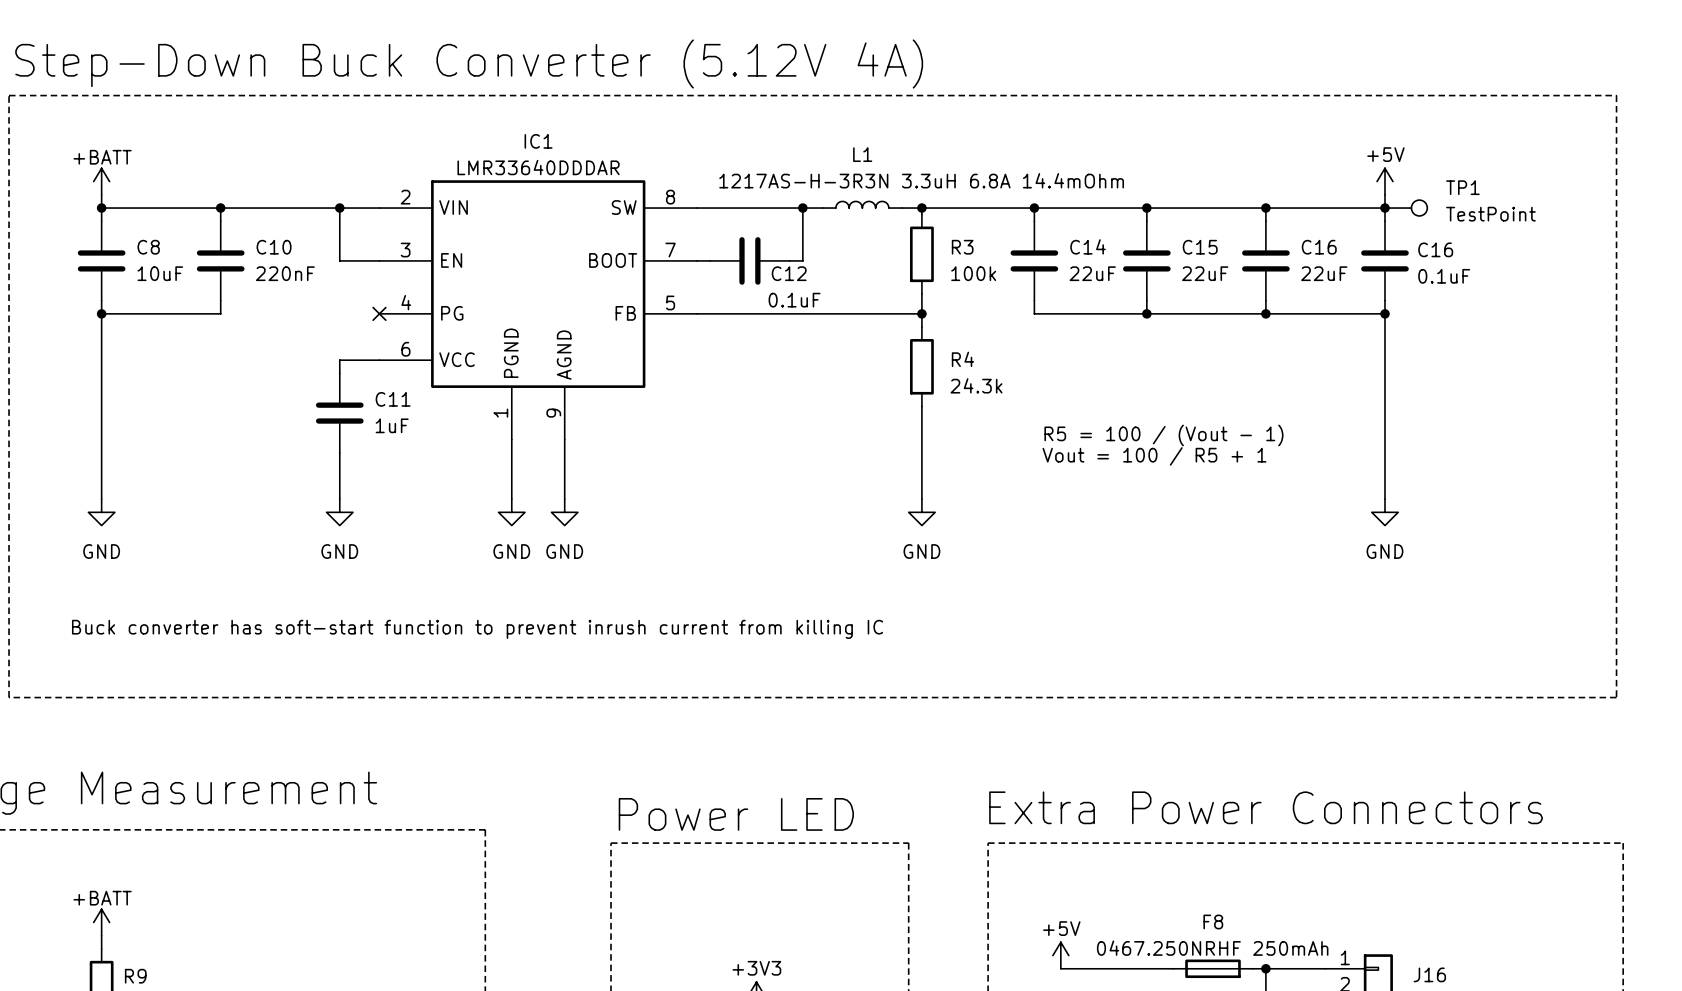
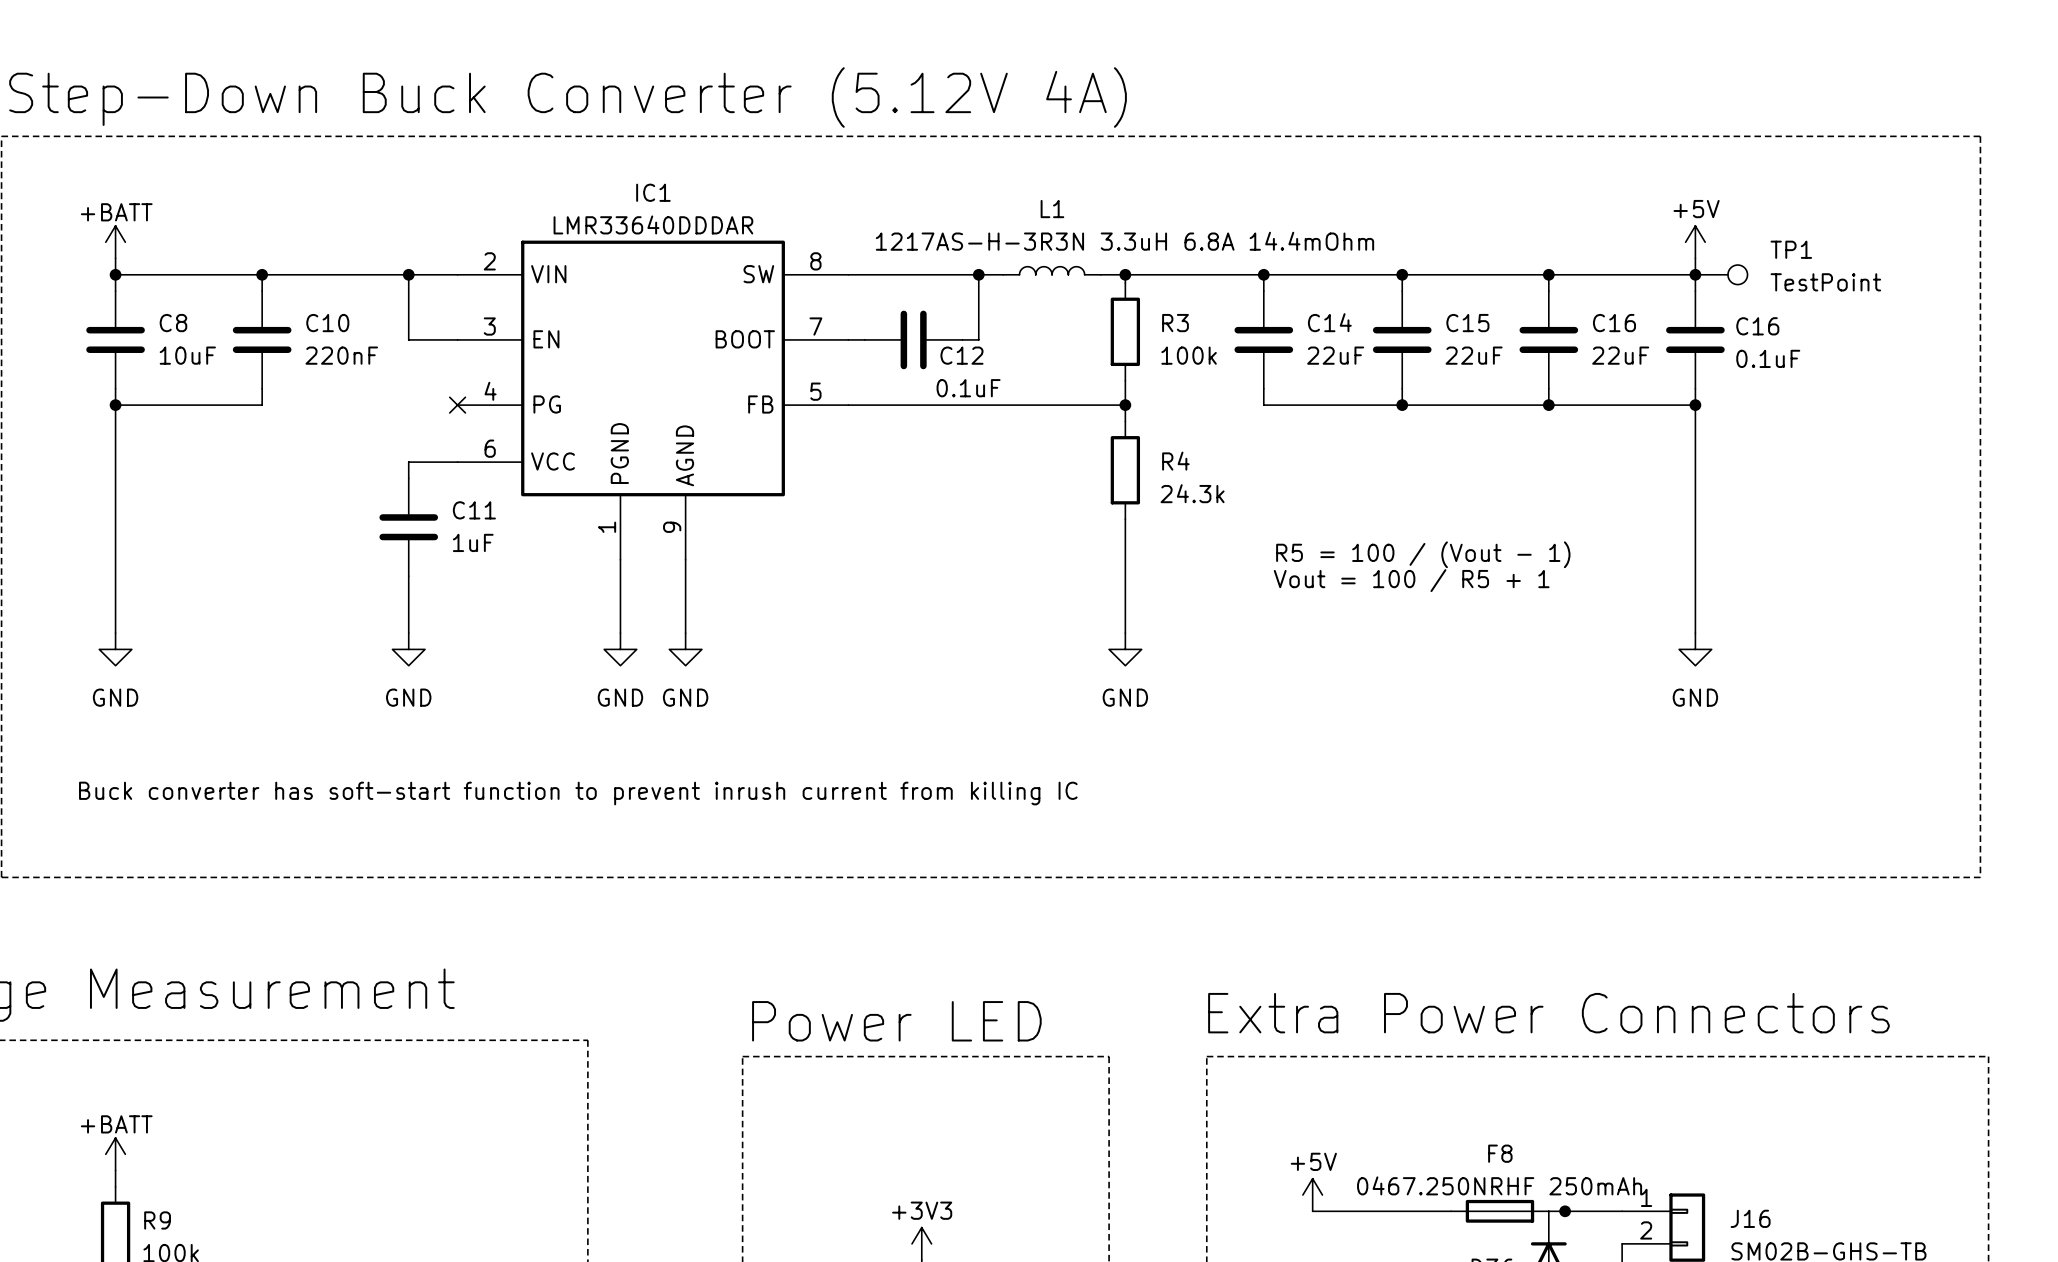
power symbol position: +5V (1060, 955) -> +5V (1312, 1195)
wire: (1060, 968) (1074, 968) -> none
F8 position: (1213, 968) -> (1499, 1211)
junction position: (1265, 968) -> (1565, 1211)

